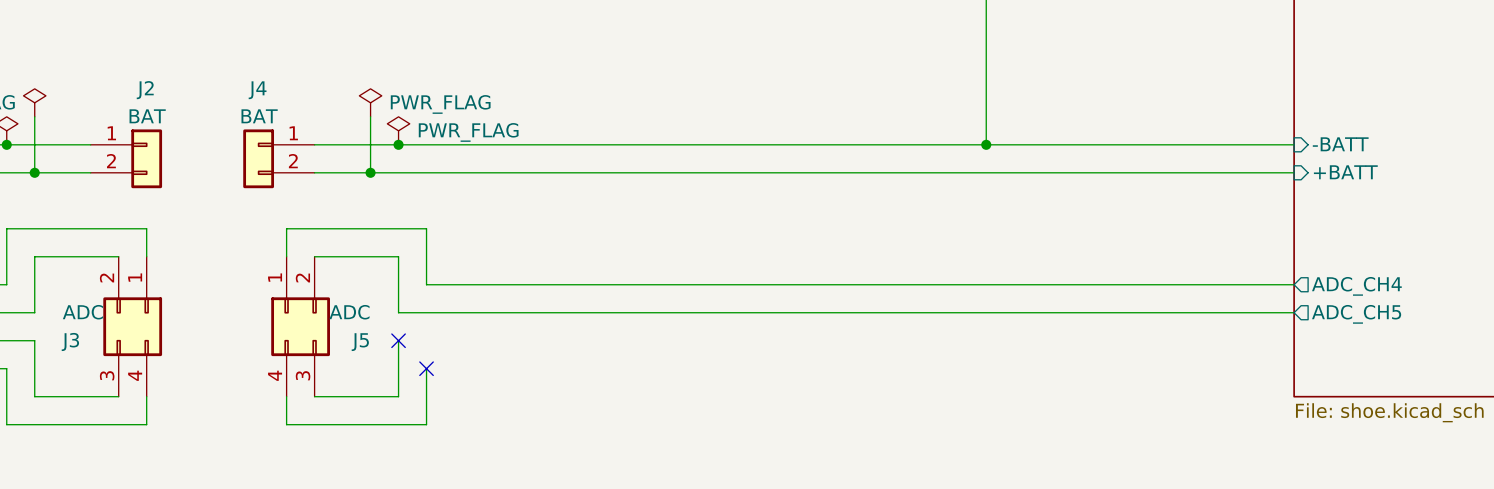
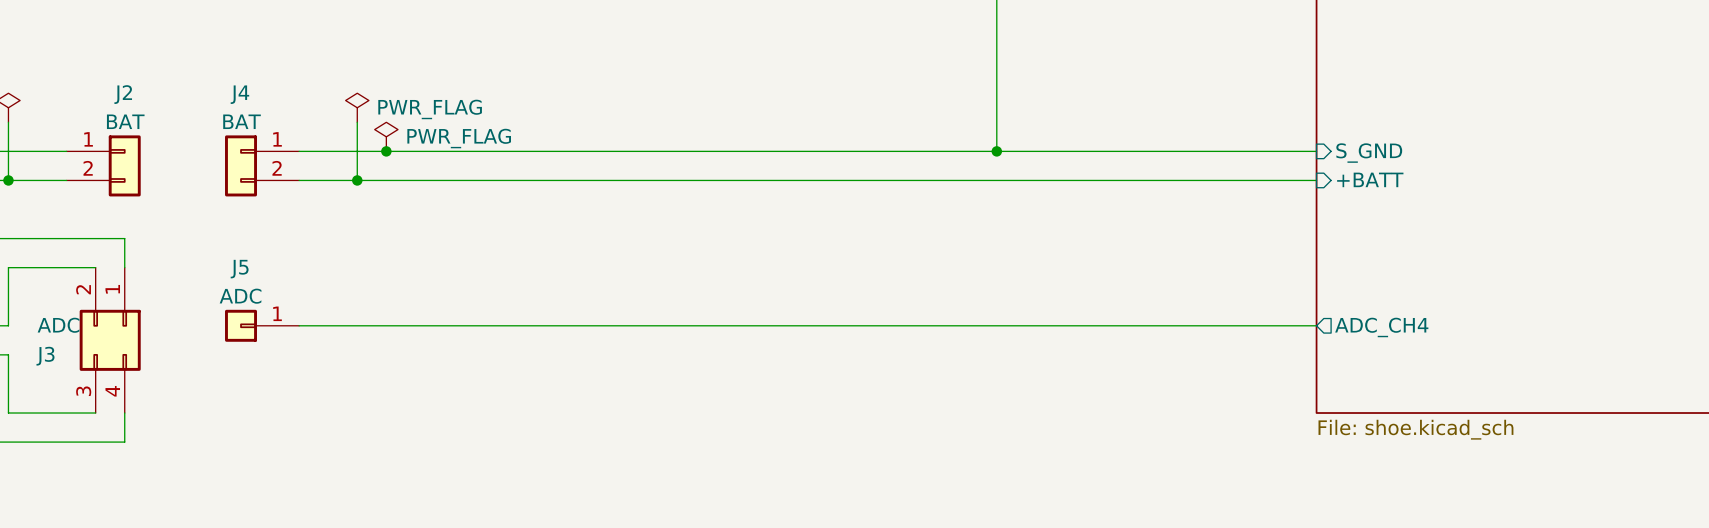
sheet pin: -BATT (1340, 144) -> S_GND (1369, 153)
J5 symbol: [271, 256, 330, 397] -> [225, 309, 300, 342]
wire: (286, 256) (286, 228) (426, 228) (426, 284) (1294, 284) -> none
wire: (314, 256) (398, 256) (398, 312) -> (299, 325) (386, 325)
sheet pin: ADC_CH4 (1356, 286) -> none
J5 value position: ADC (349, 312) -> ADC (240, 296)
sheet pin: ADC_CH5 (1356, 314) -> ADC_CH4 (1381, 327)
wire: (398, 340) (398, 396) (314, 396) -> none
no-connect mark: (398, 340) -> none
J5 name position: J5 (360, 342) -> J5 (239, 269)
wire: (426, 368) (426, 424) (286, 424) (286, 396) -> none
no-connect mark: (426, 368) -> none

